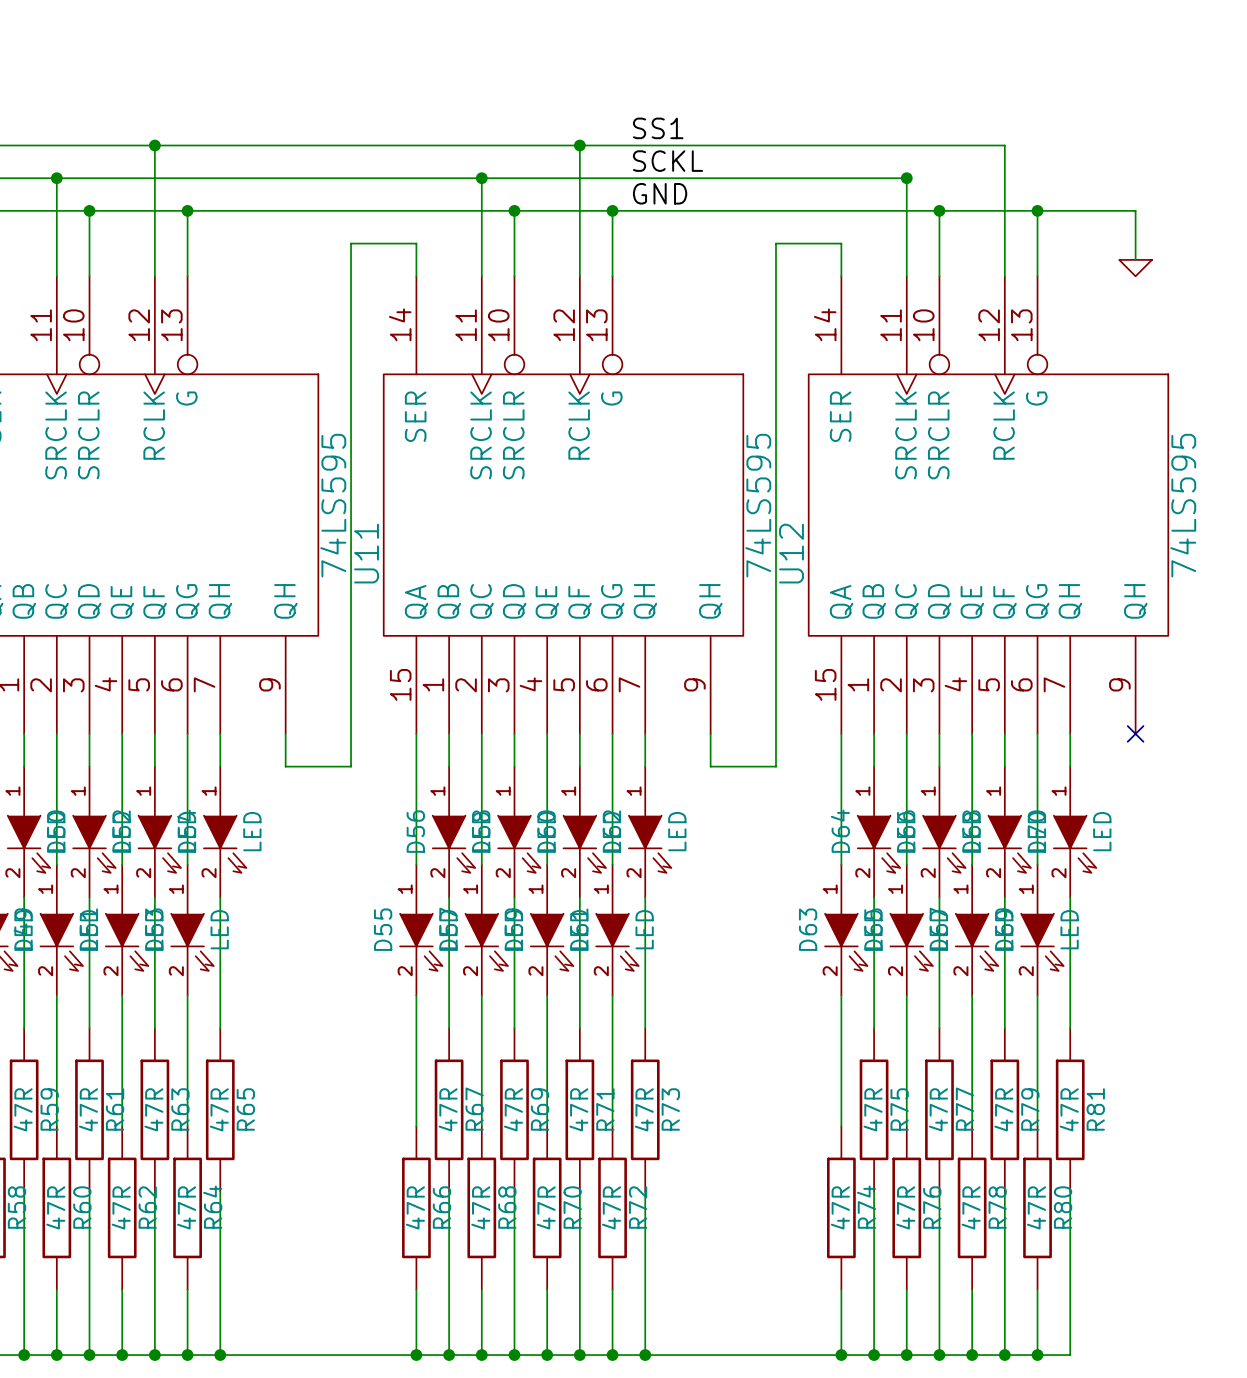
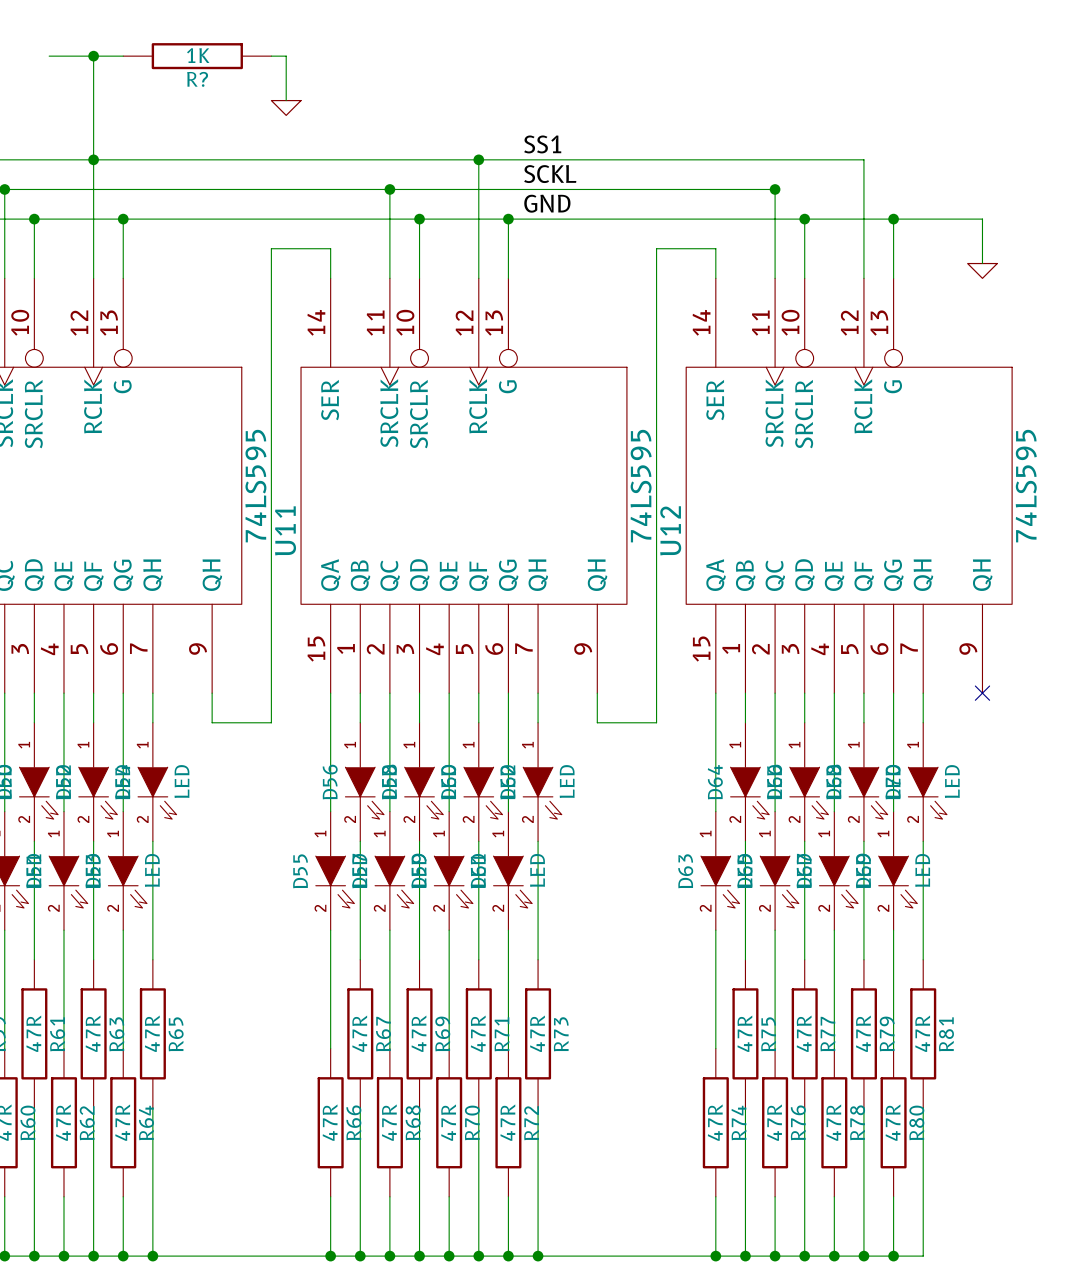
wire: none -> (49, 56) (123, 56)
wire: none -> (93, 56) (93, 159)
junction: none -> (93, 56)
R?: none -> 1K (197, 56)
wire: none -> (271, 56) (286, 56) (286, 100)
power symbol: none -> (286, 107)

